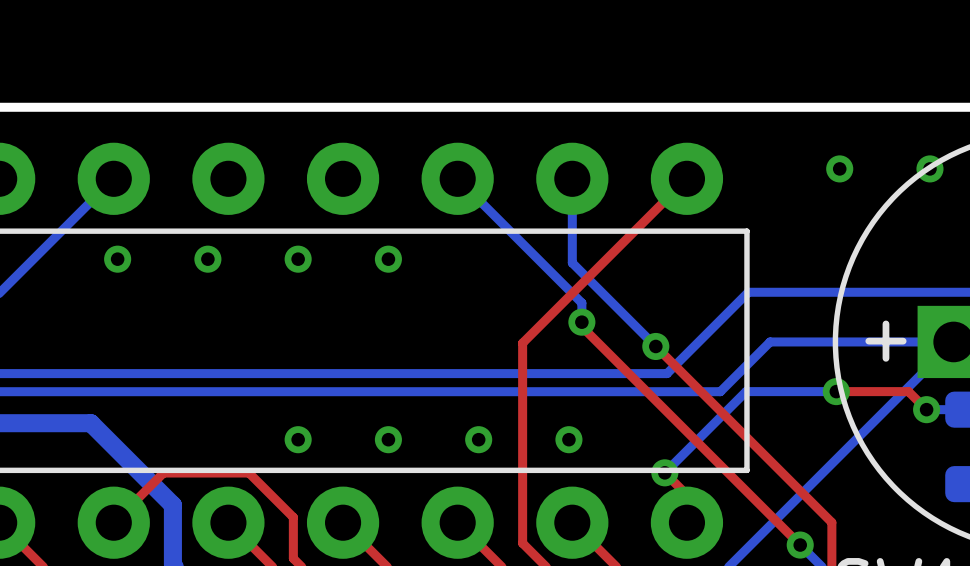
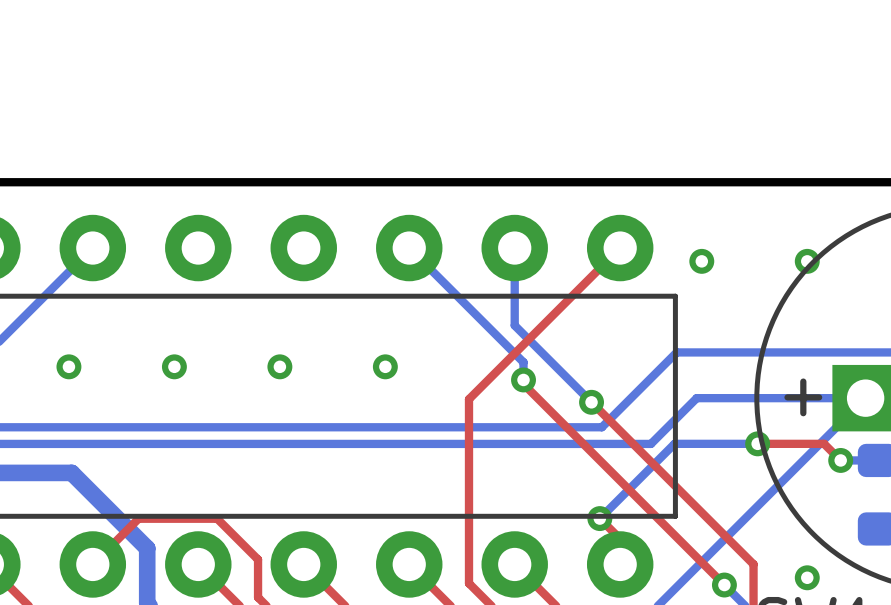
via: (839, 168) -> none
via: (929, 168) -> none
via: none -> (701, 261)
via: none -> (807, 261)
via: (117, 259) -> none
via: (207, 259) -> none
via: (298, 259) -> none
via: (388, 259) -> none
via: none -> (68, 366)
via: none -> (174, 366)
via: none -> (279, 366)
via: none -> (385, 366)
via: (298, 439) -> none
via: (388, 439) -> none
via: (478, 439) -> none
via: (568, 439) -> none
via: none -> (807, 577)

